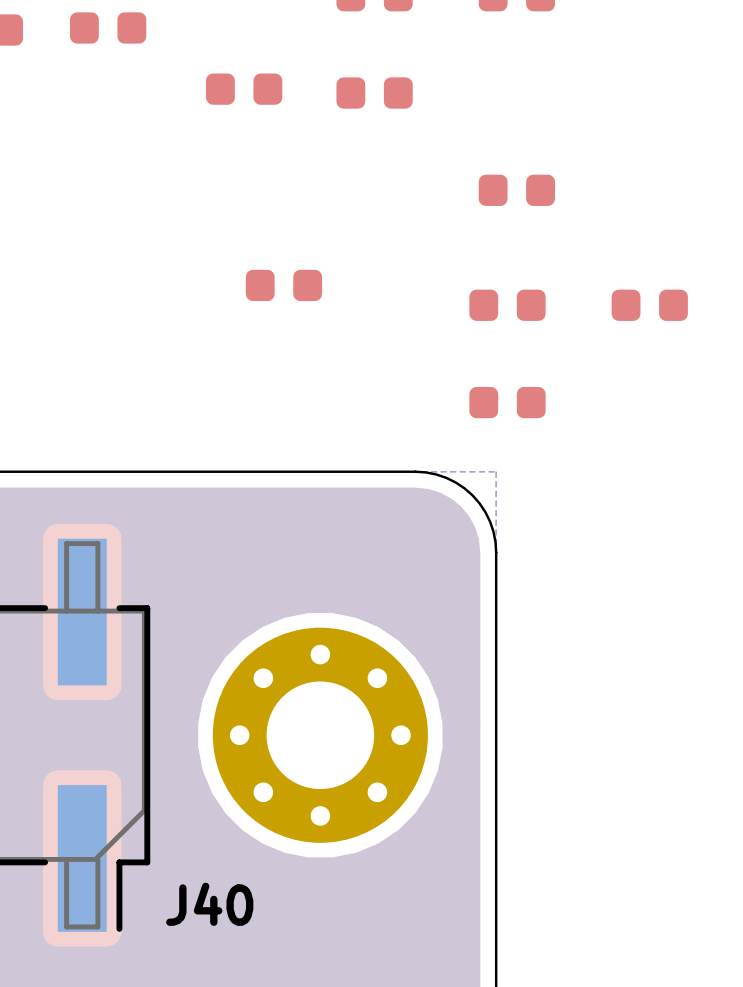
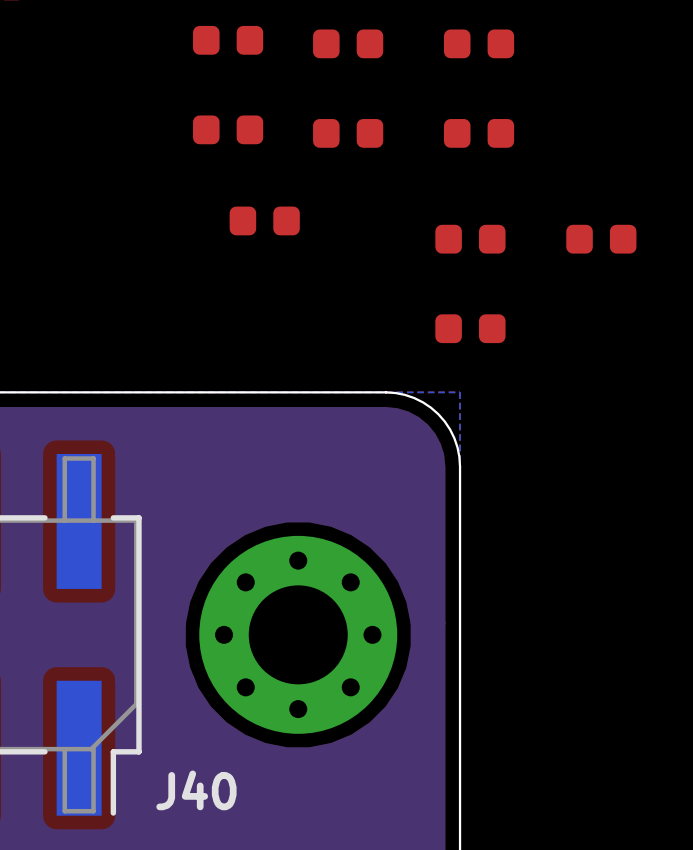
part: none -> (479, 43)
part: none -> (228, 129)
part: none -> (348, 133)

